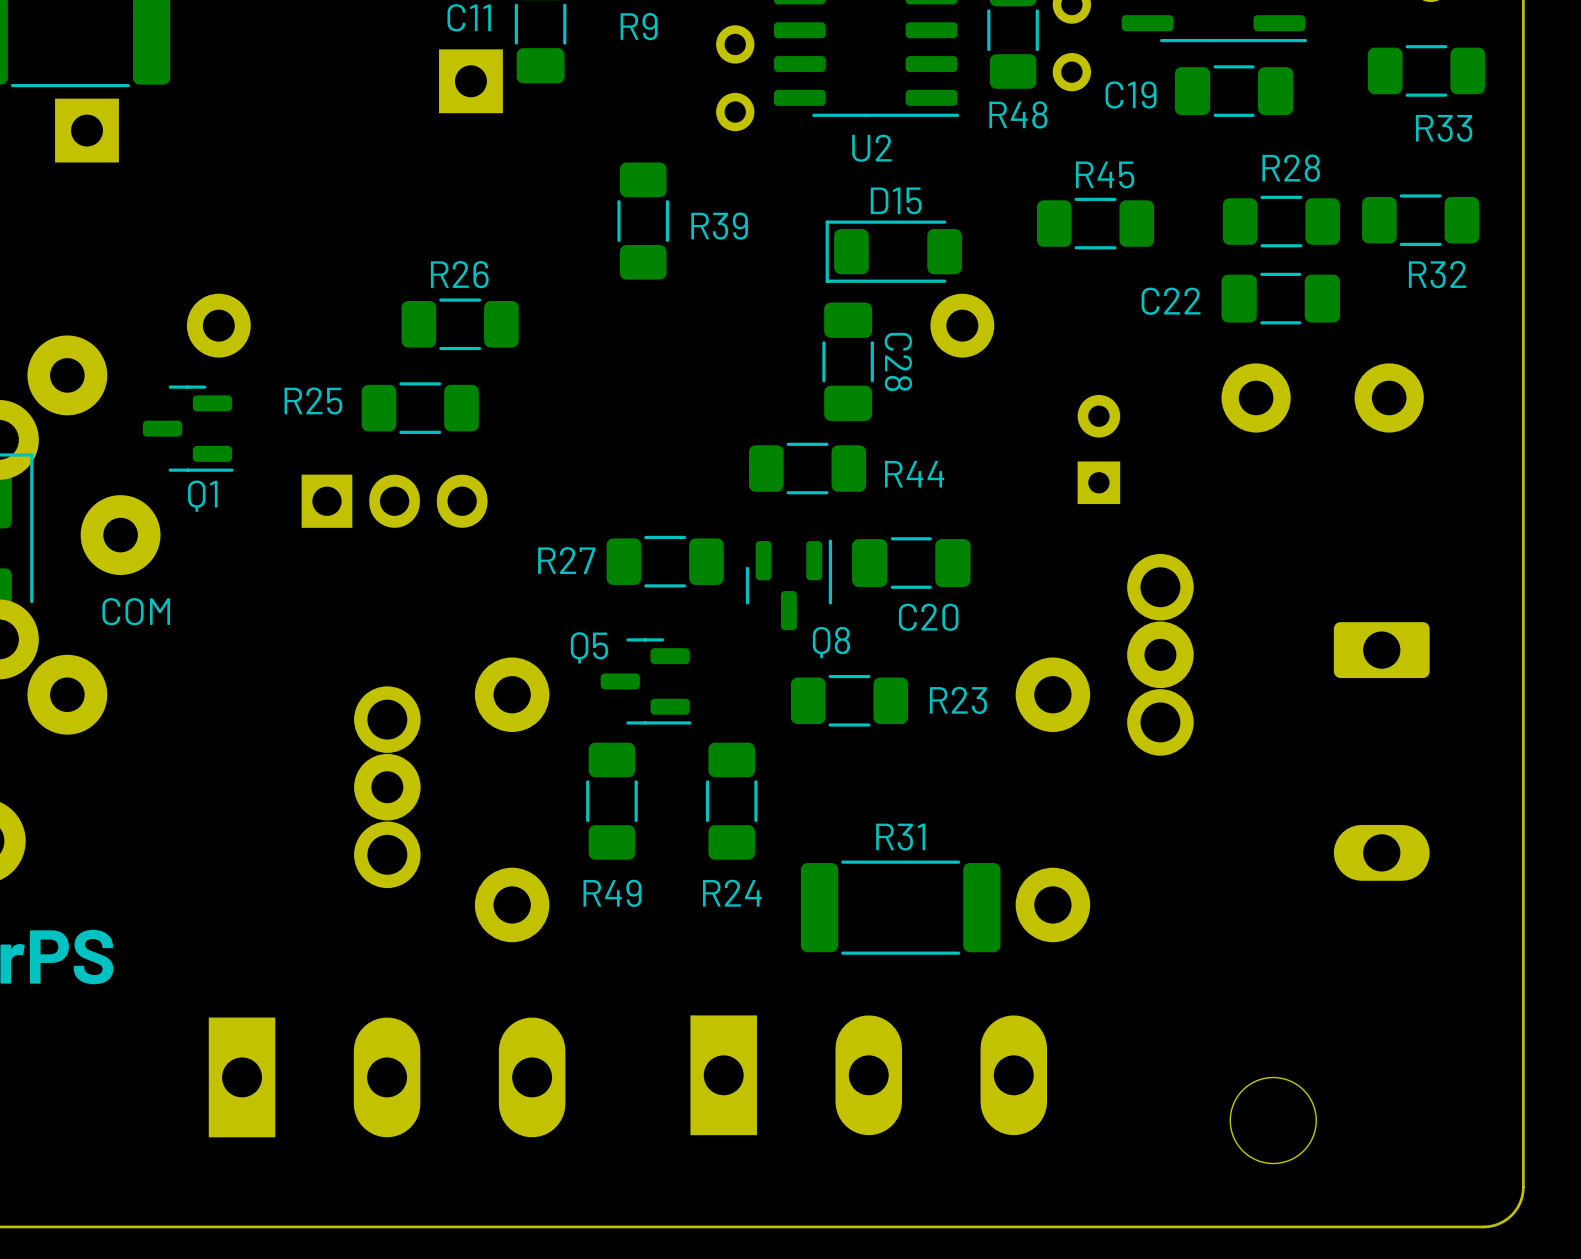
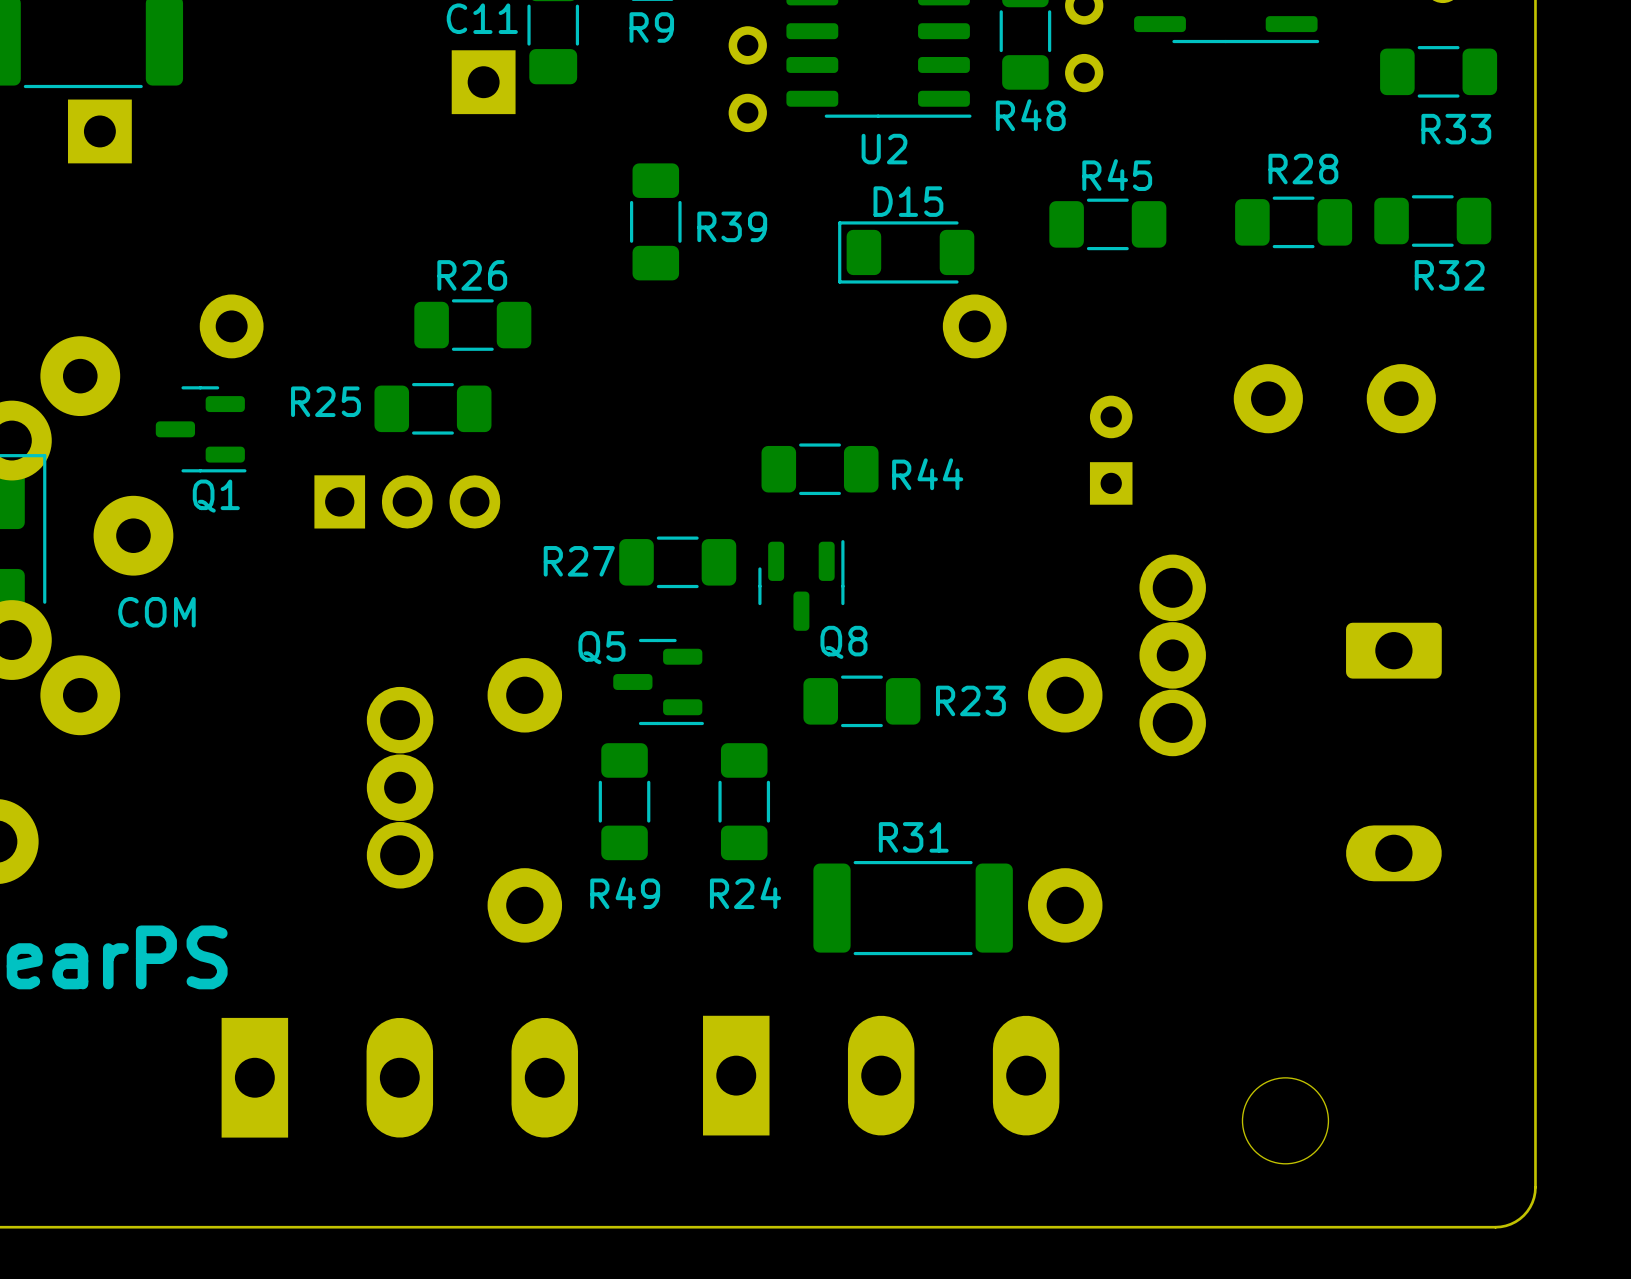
C19: (1234, 91) -> none
C22: (1280, 298) -> none
C28: (848, 361) -> none
C20: (911, 563) -> none

